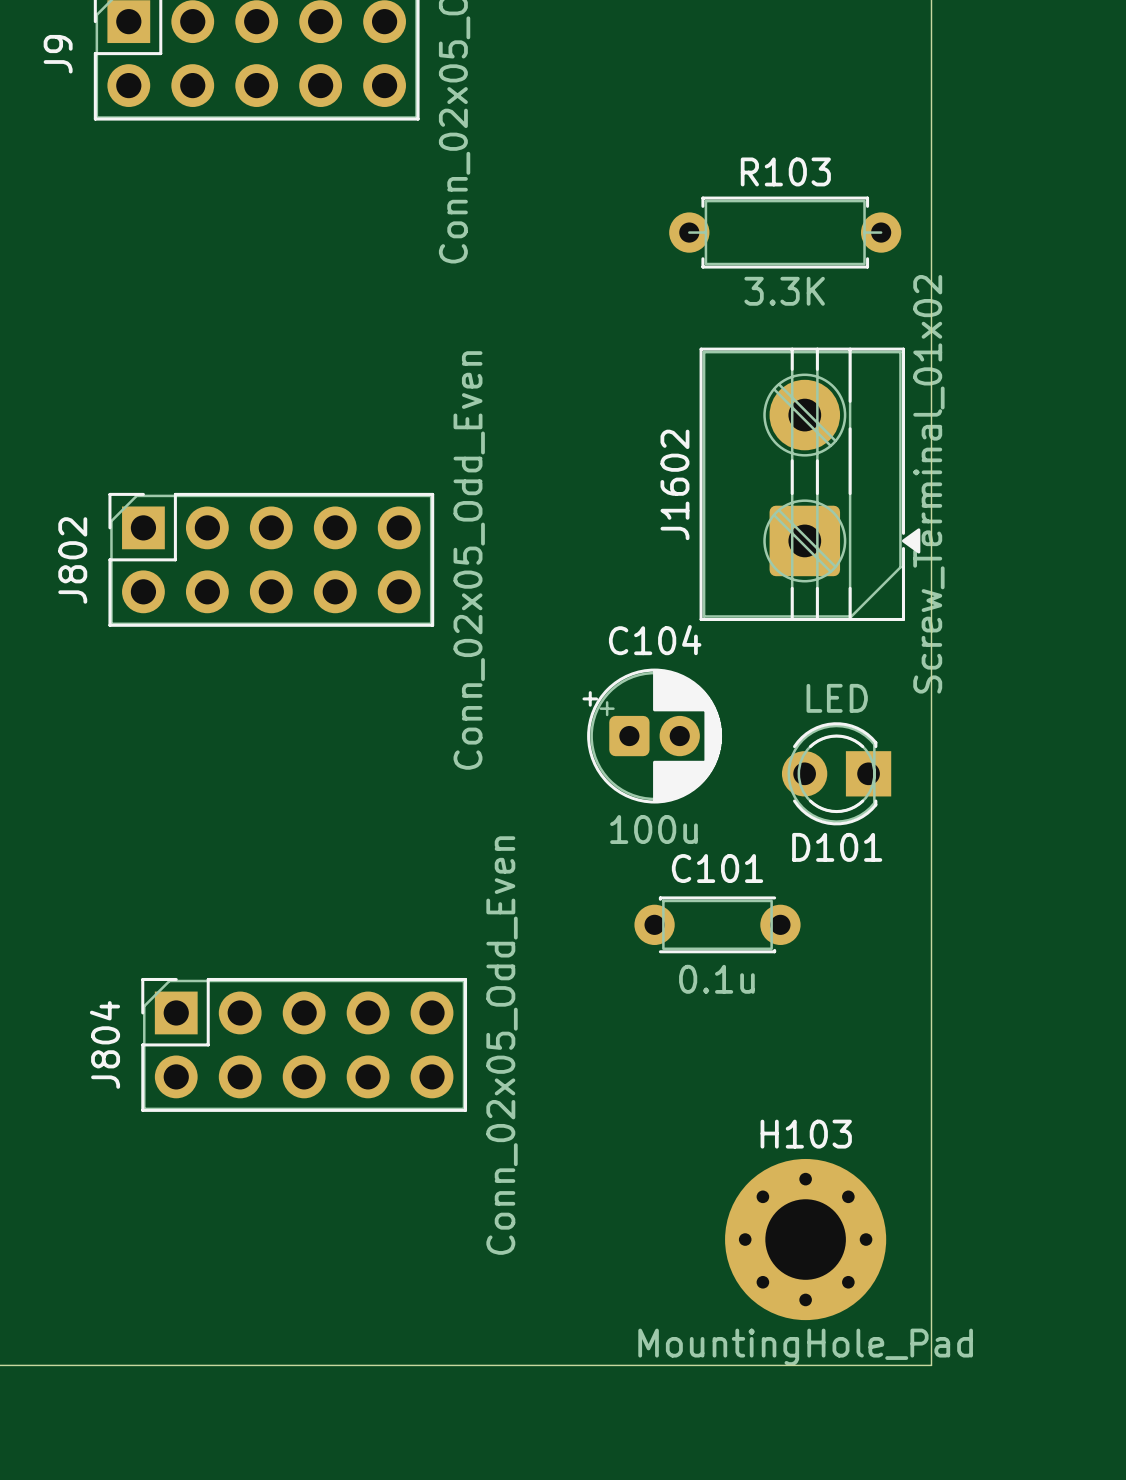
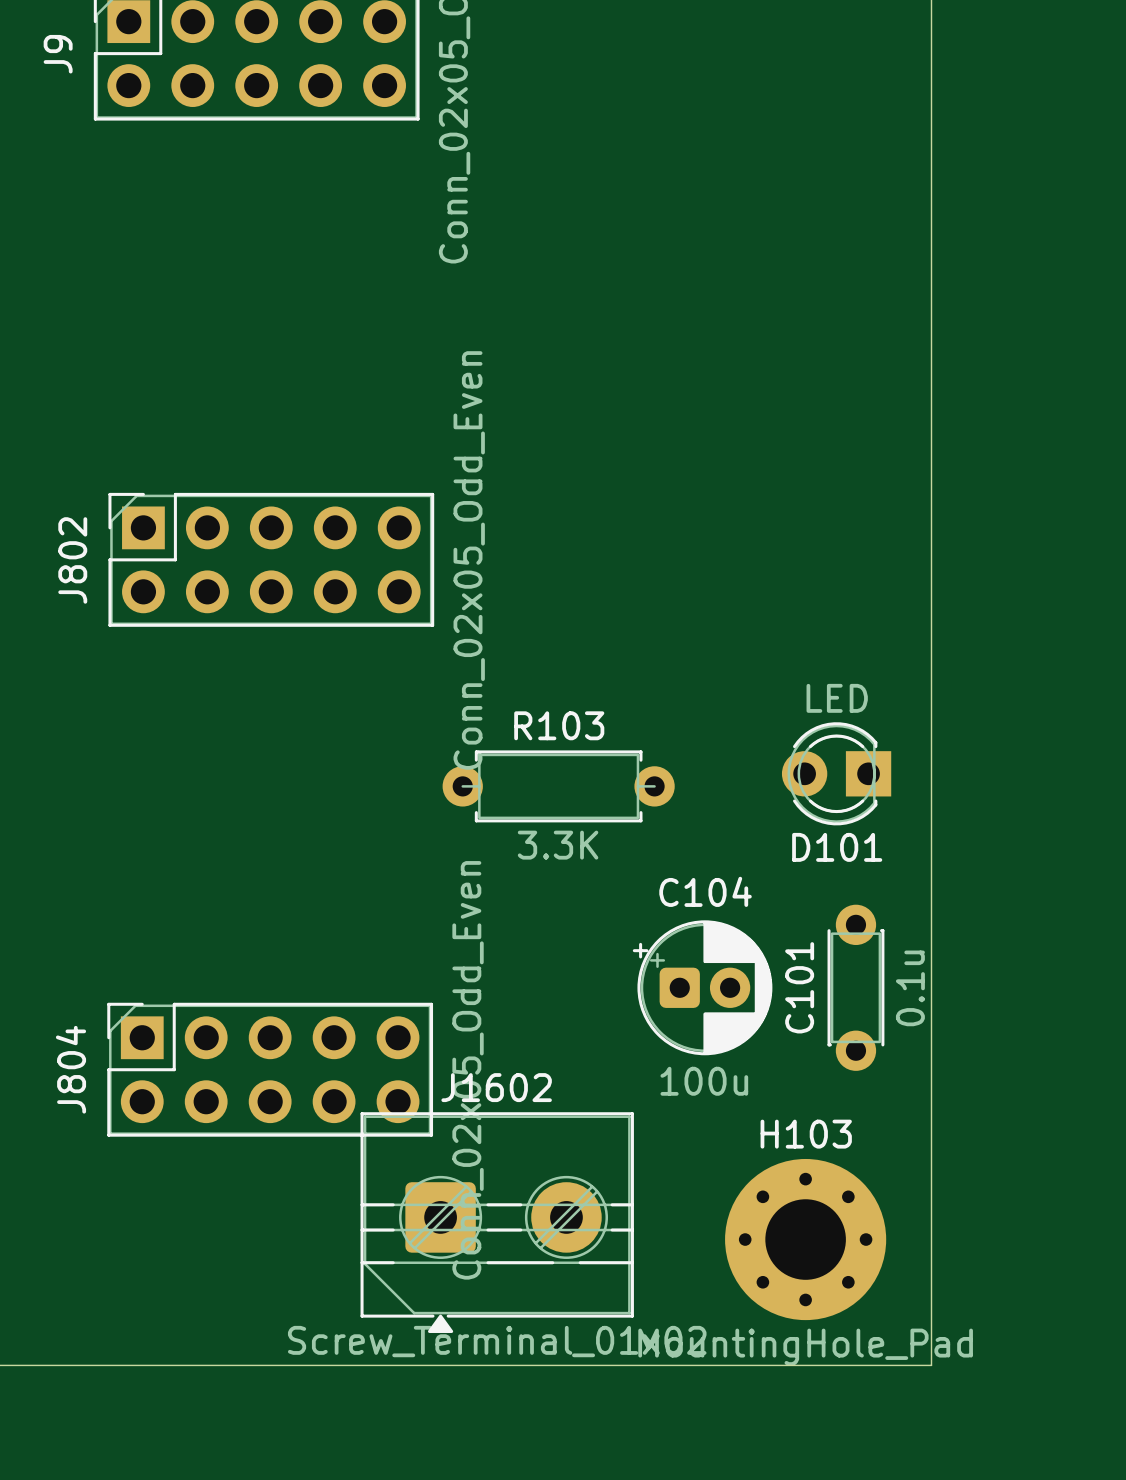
R103 position: (785, 232) -> (558, 786)
J1602 rotation: 0° (809, 484) -> 90° clockwise (497, 1222)
J1602 position: (809, 484) -> (497, 1222)
C104 position: (652, 736) -> (702, 987)
C101 name position: C101 (717, 868) -> C101 (799, 987)
C101 rotation: 0° (717, 924) -> 90° clockwise (855, 987)
C101 position: (717, 924) -> (855, 987)
C101 value position: 0.1u (716, 979) -> 0.1u (910, 988)
J804 position: (304, 1044) -> (270, 1069)

